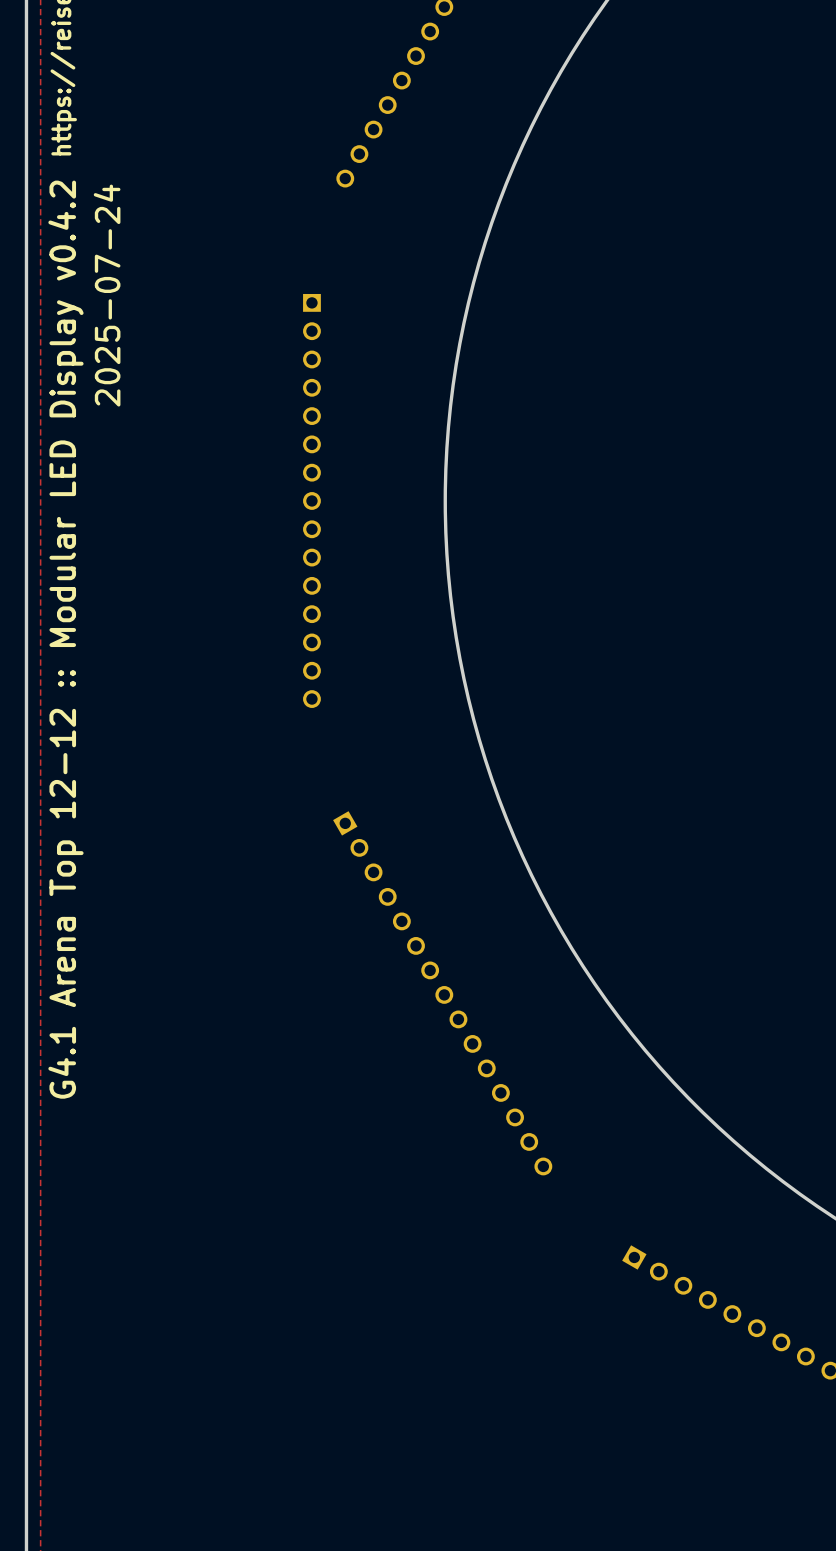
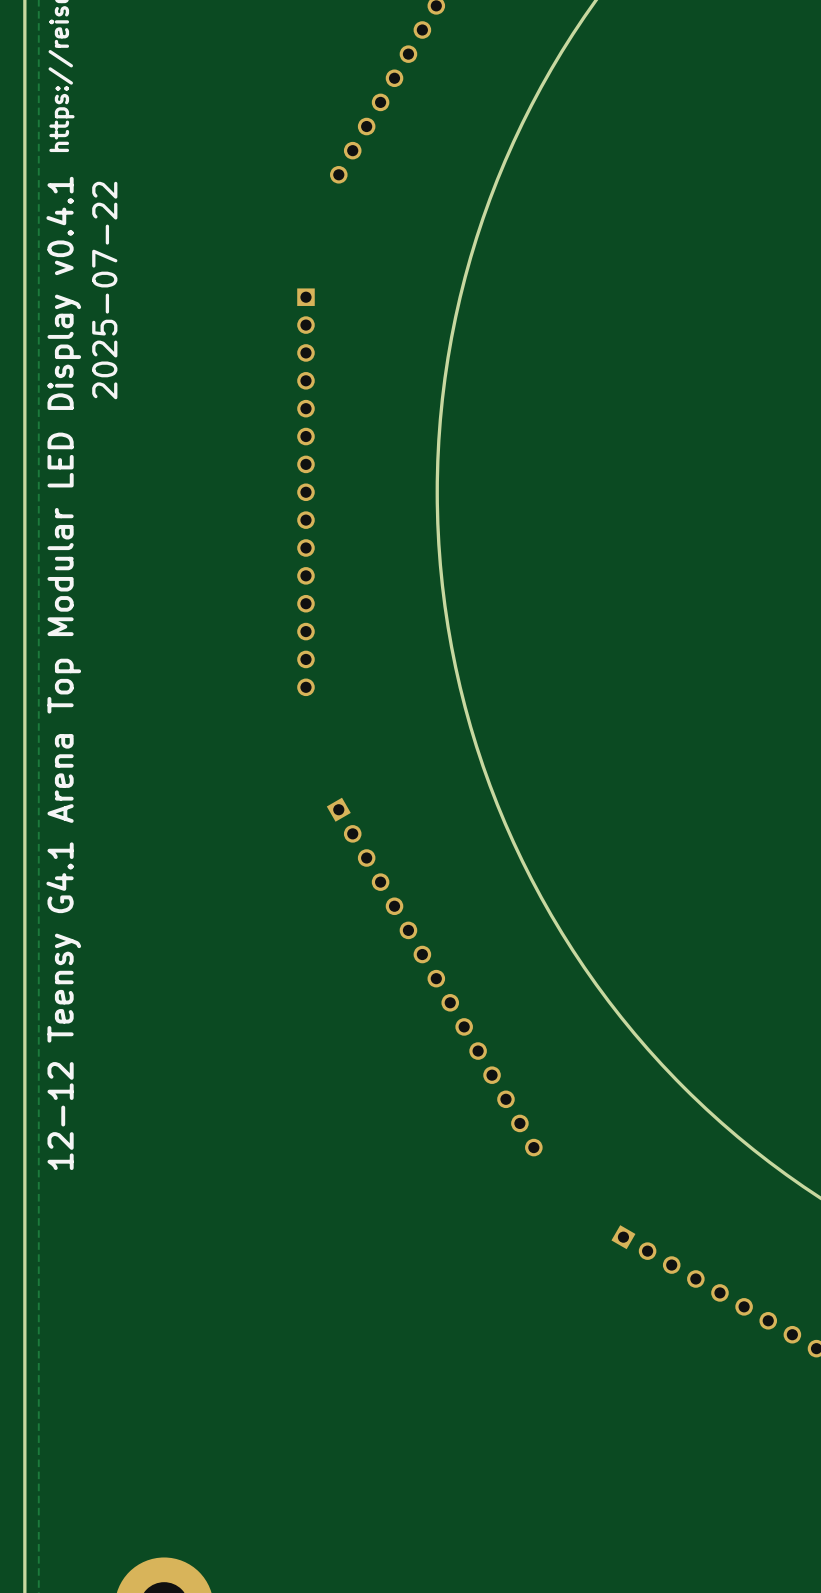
text: 2025-07-24 (107, 295) -> 2025-07-22 (104, 290)
text: G4.1 Arena Top 12-12 :: Modular LED Display v0.4.2 (65, 639) -> 12-12 Teensy G4.1 Arena Top Modular LED Display v0.4.1 (63, 673)

